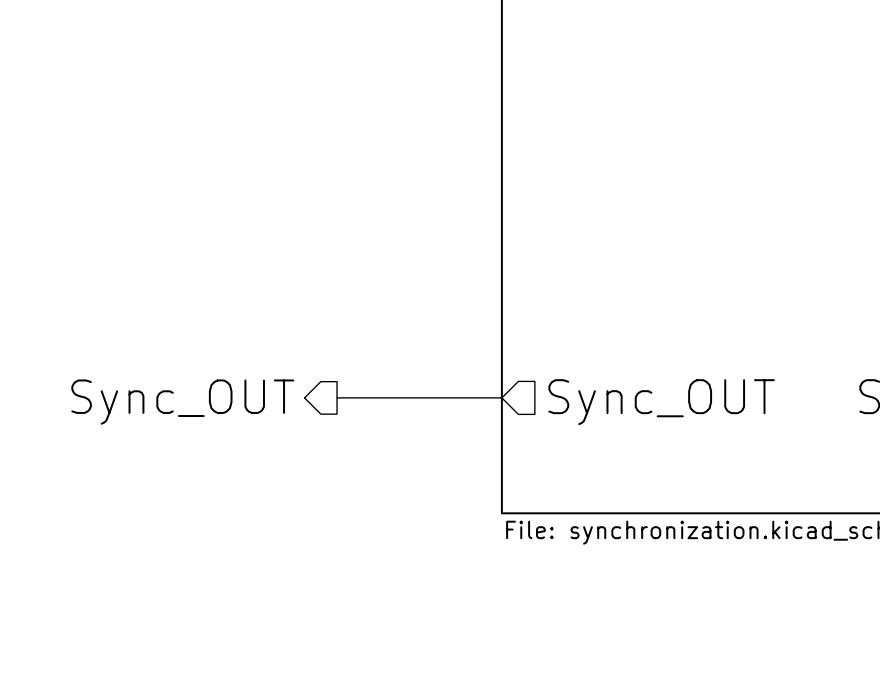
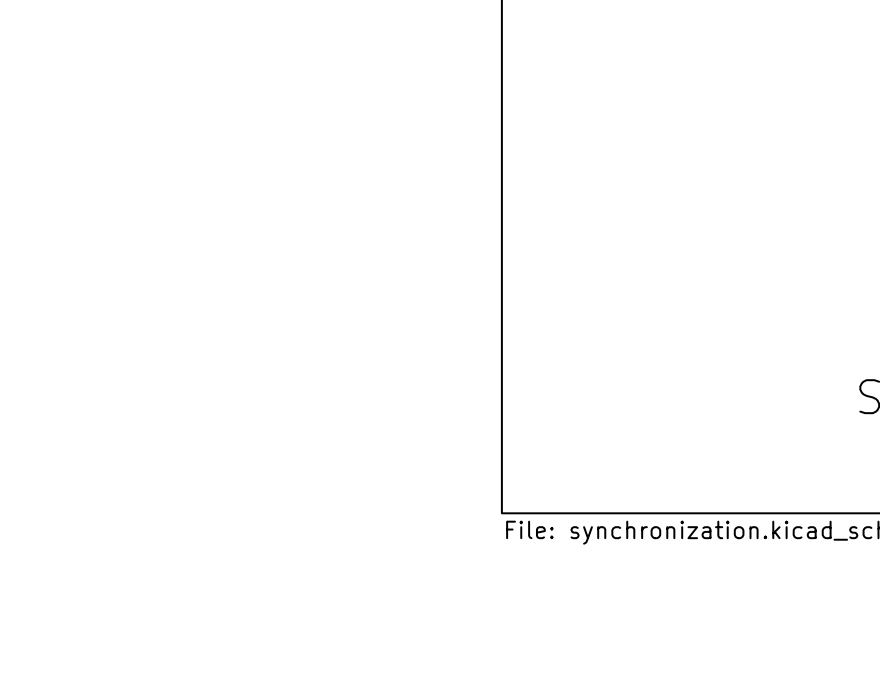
bus: (337, 397) (501, 397) -> none
hierarchical label: Sync_OUT (182, 402) -> none
sheet pin: Sync_OUT (661, 402) -> none

